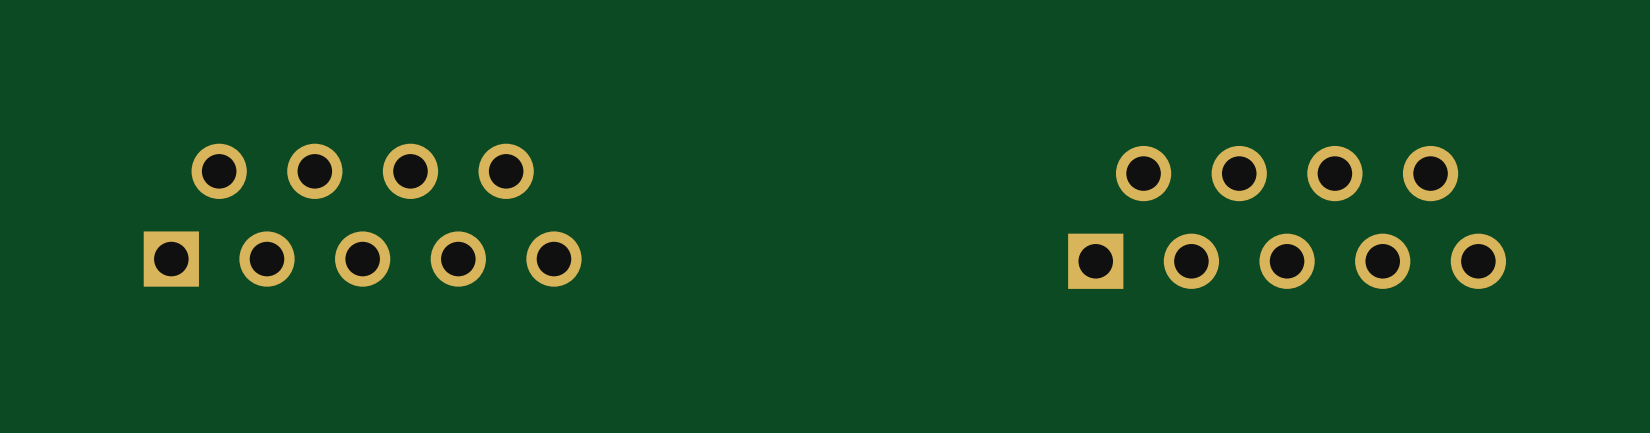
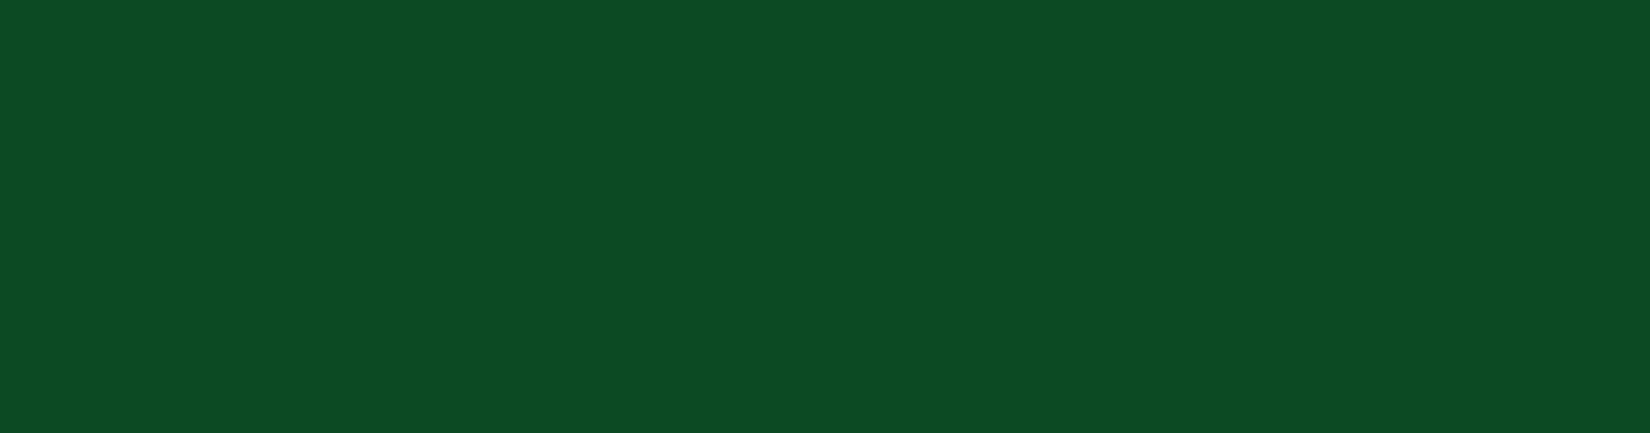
part: (362, 215) -> none
part: (1287, 217) -> none

